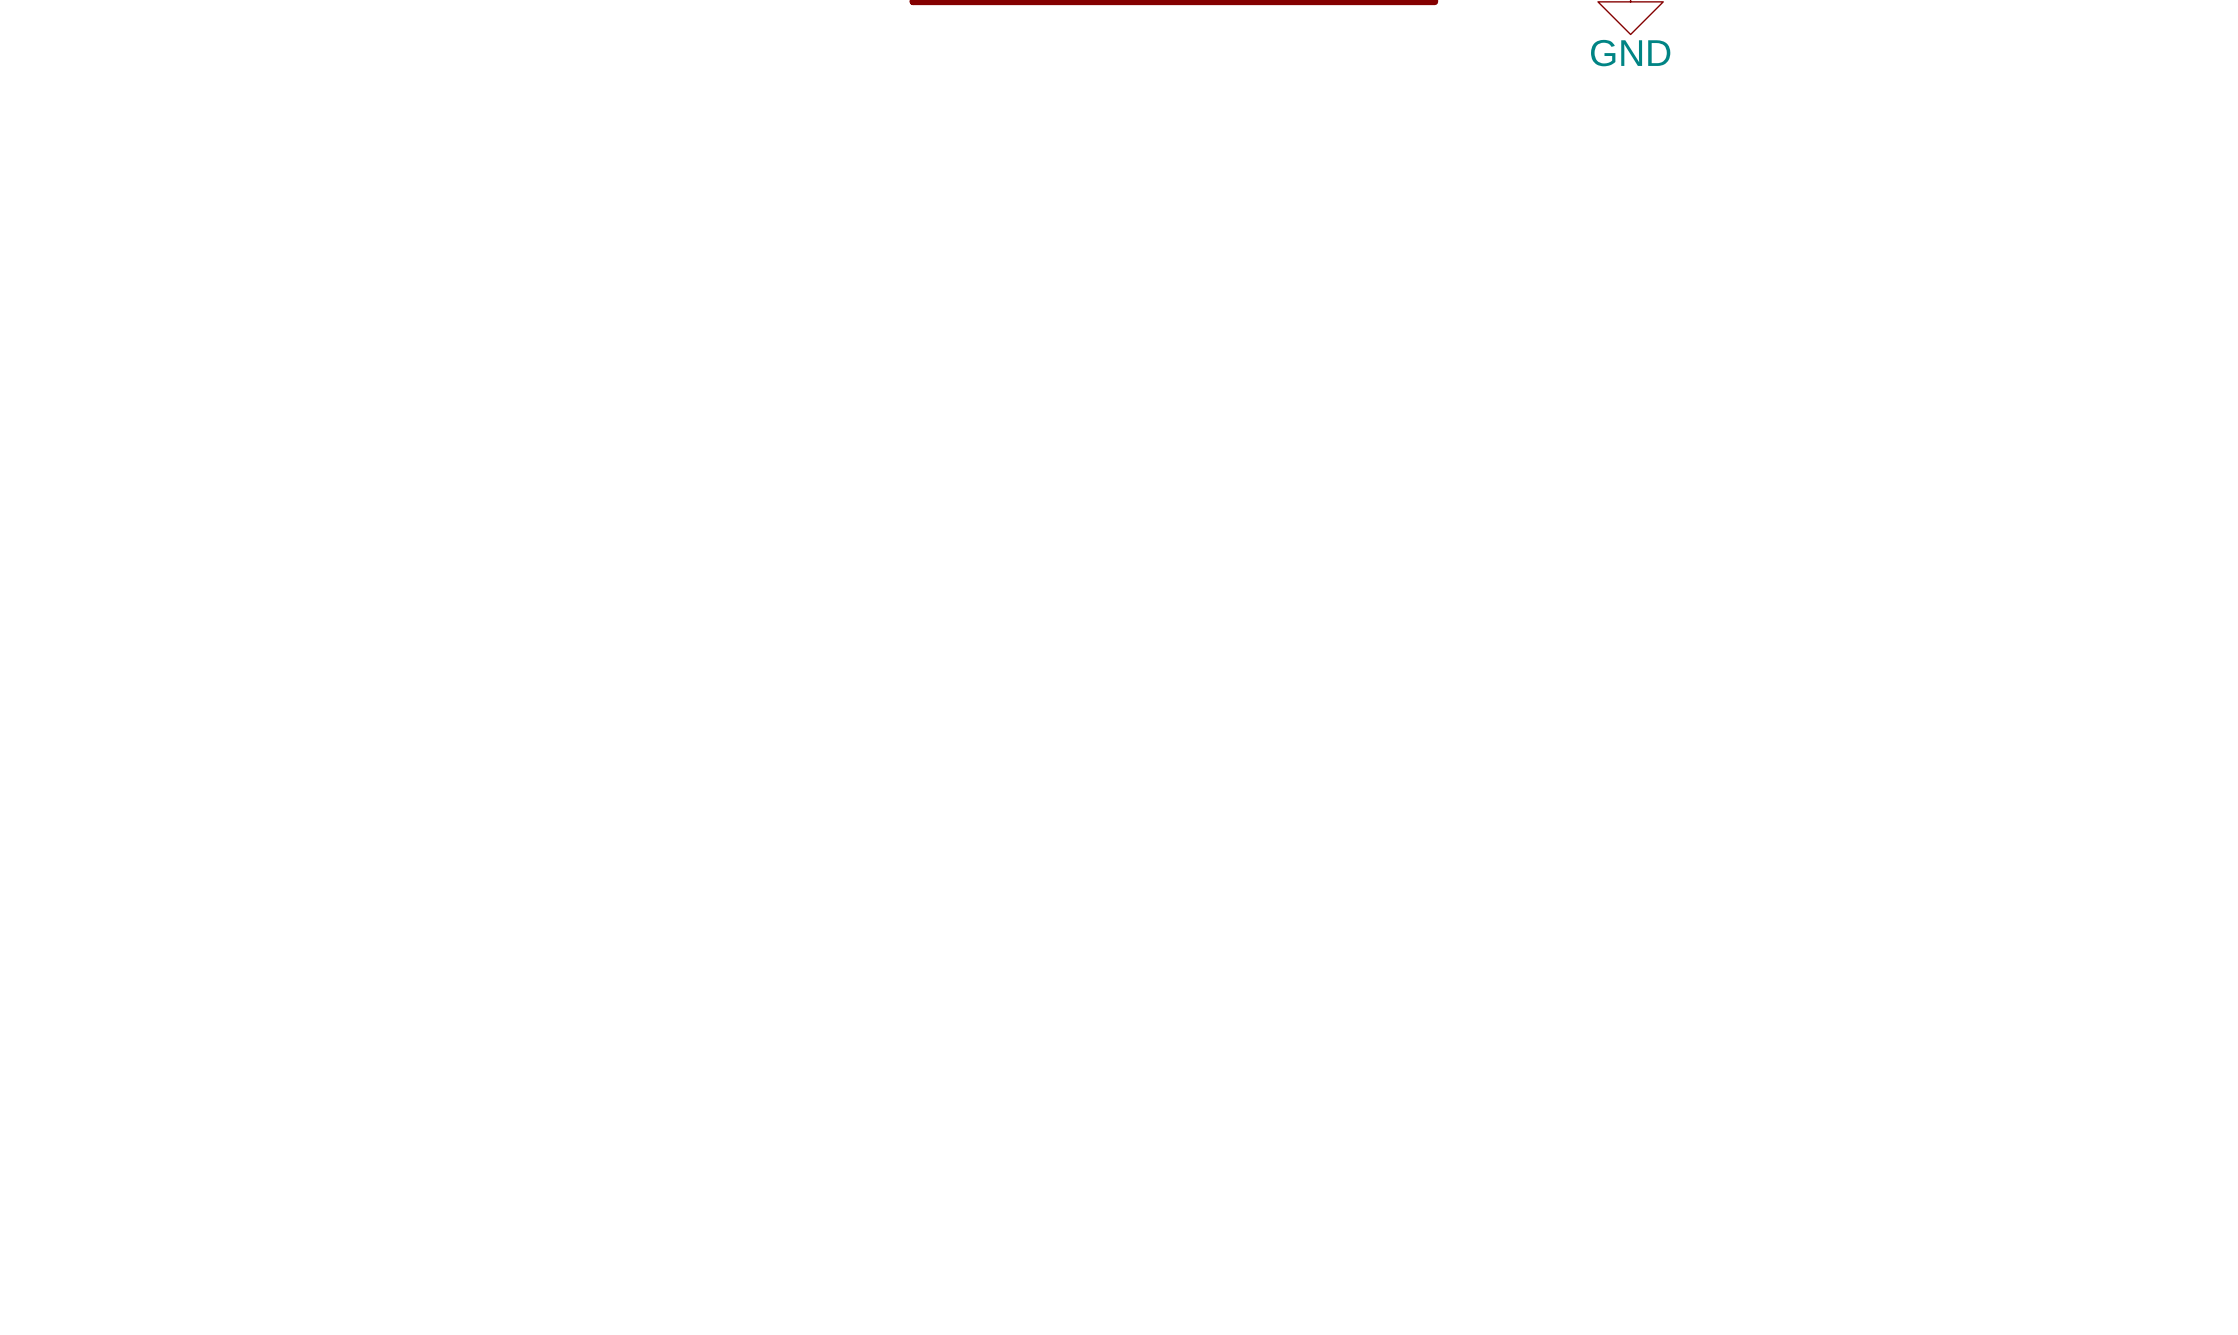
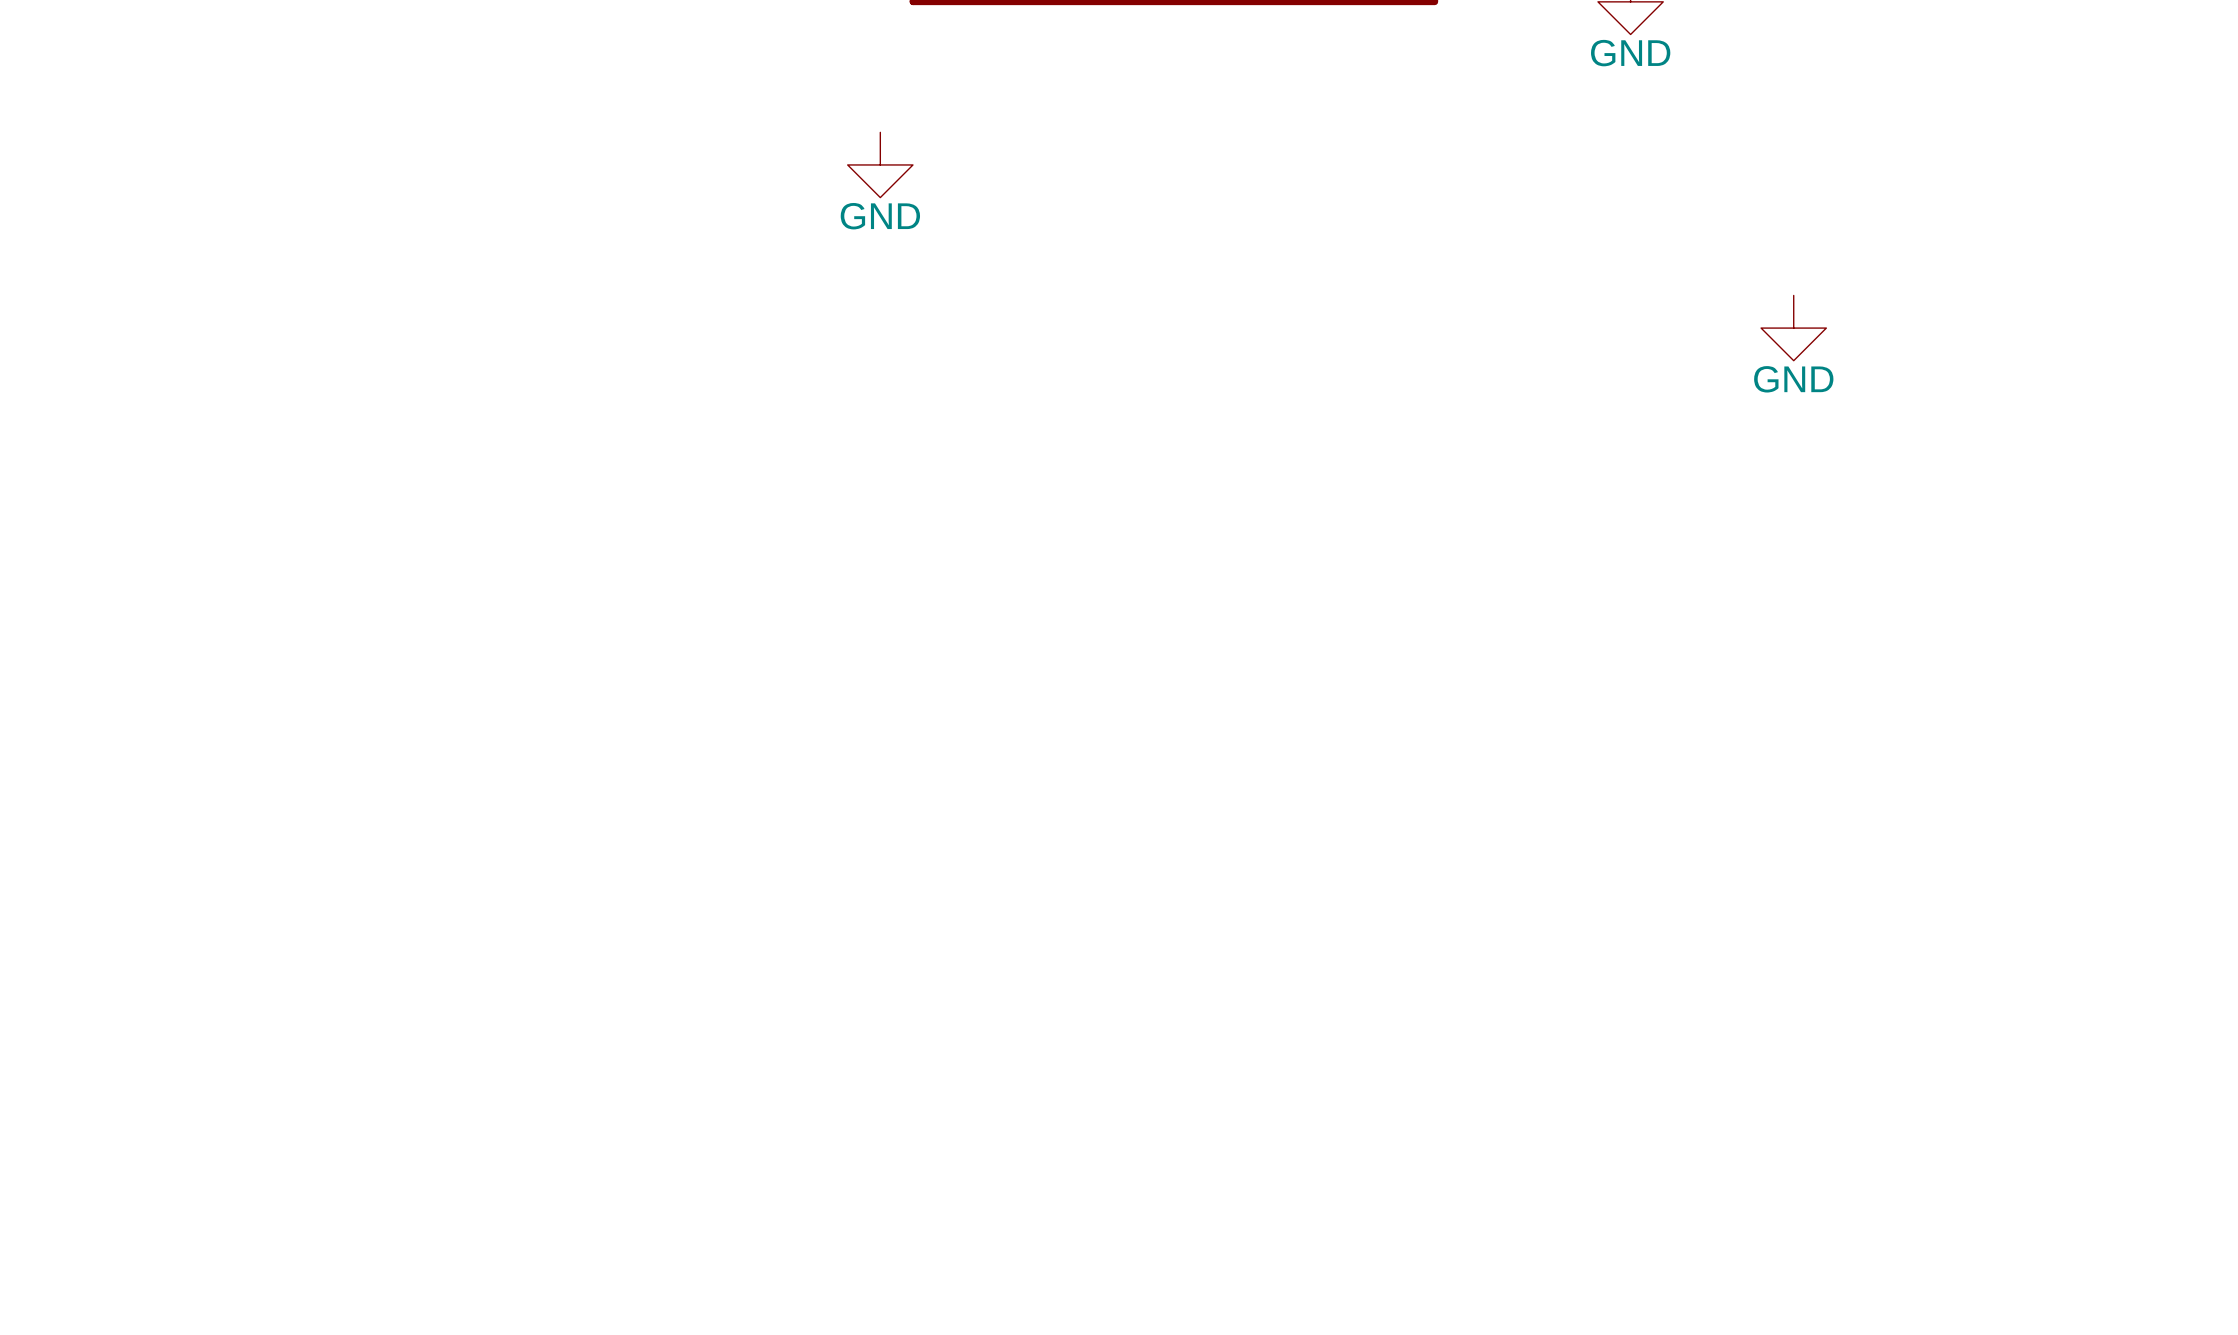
power symbol: none -> GND (880, 164)
power symbol: none -> GND (1793, 328)

